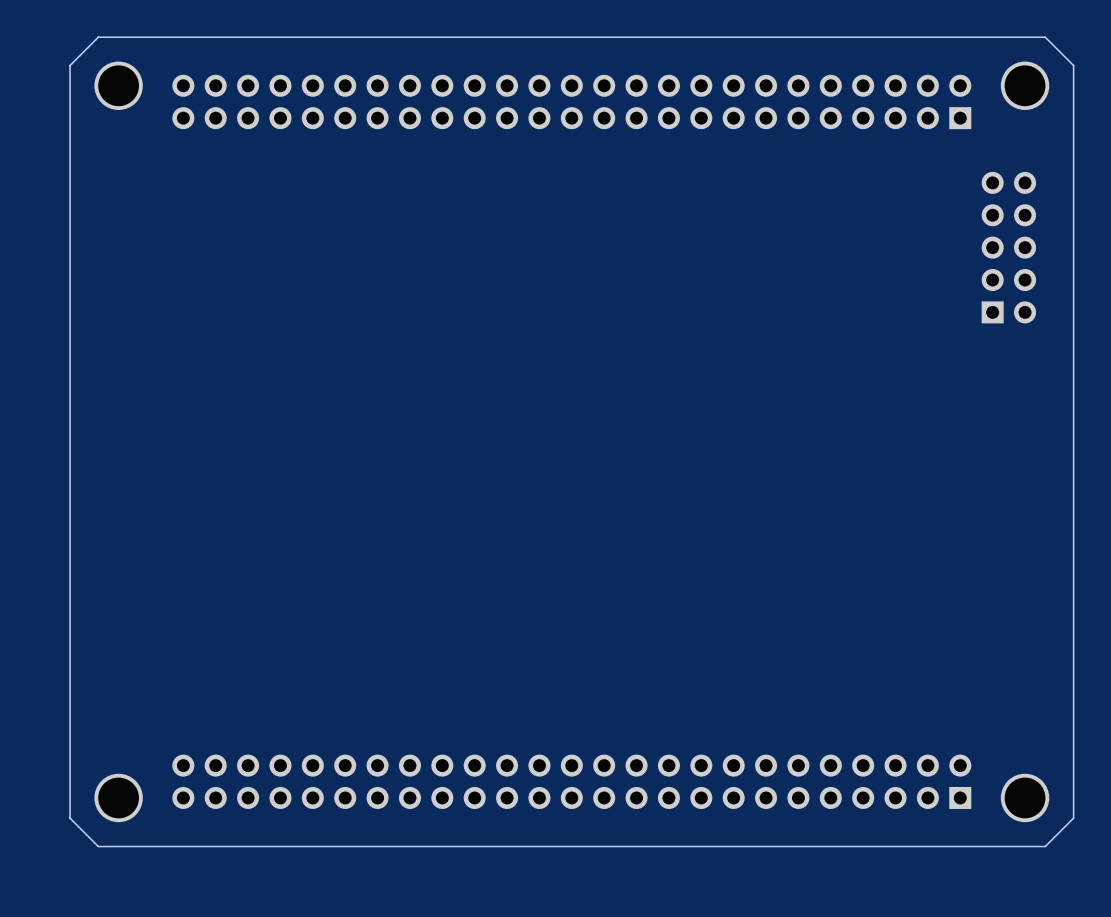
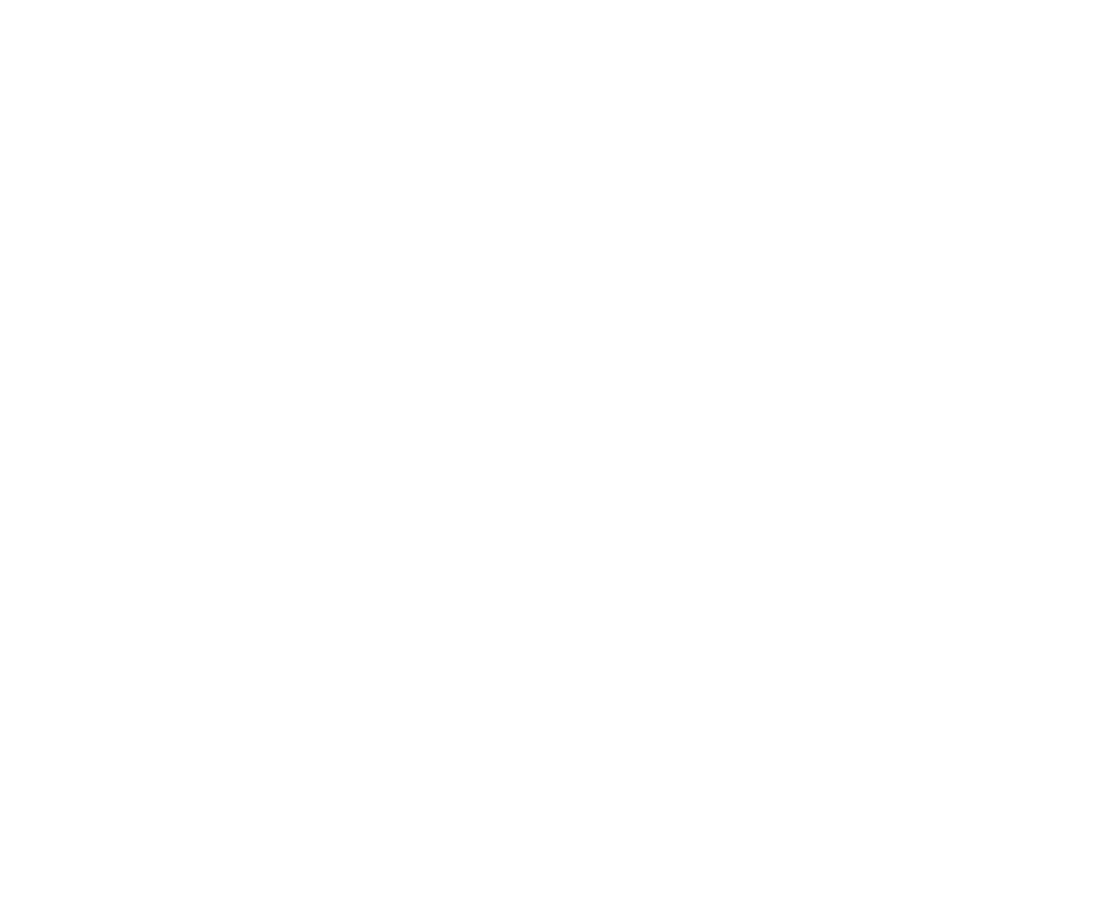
board edge: (1045, 37) (98, 37) (70, 65) (70, 818) (98, 846) (1045, 846) (1073, 818) (1073, 65) (1045, 37) -> none
part: (118, 85) -> none
part: (1025, 85) -> none
part: (571, 101) -> none
part: (1008, 247) -> none
part: (571, 781) -> none
part: (118, 797) -> none
part: (1025, 797) -> none

